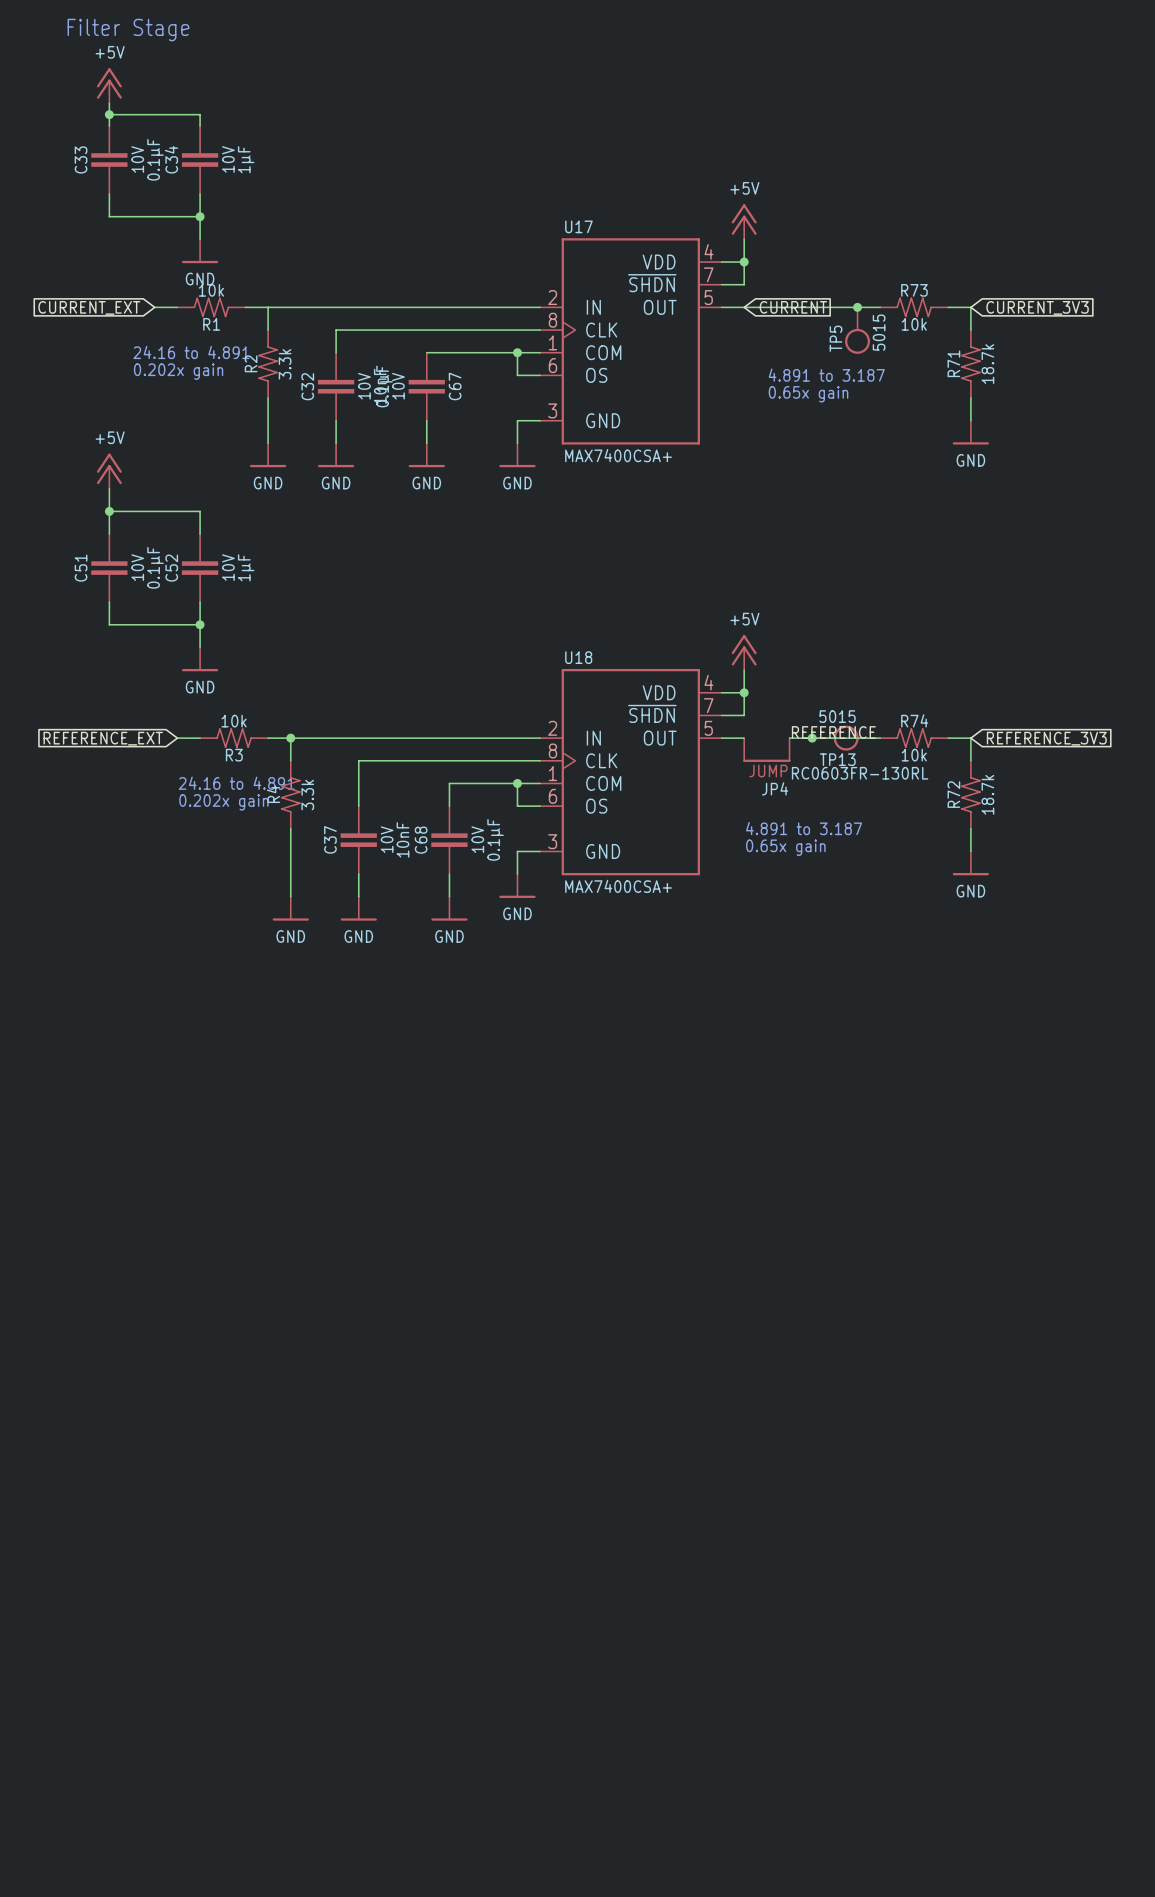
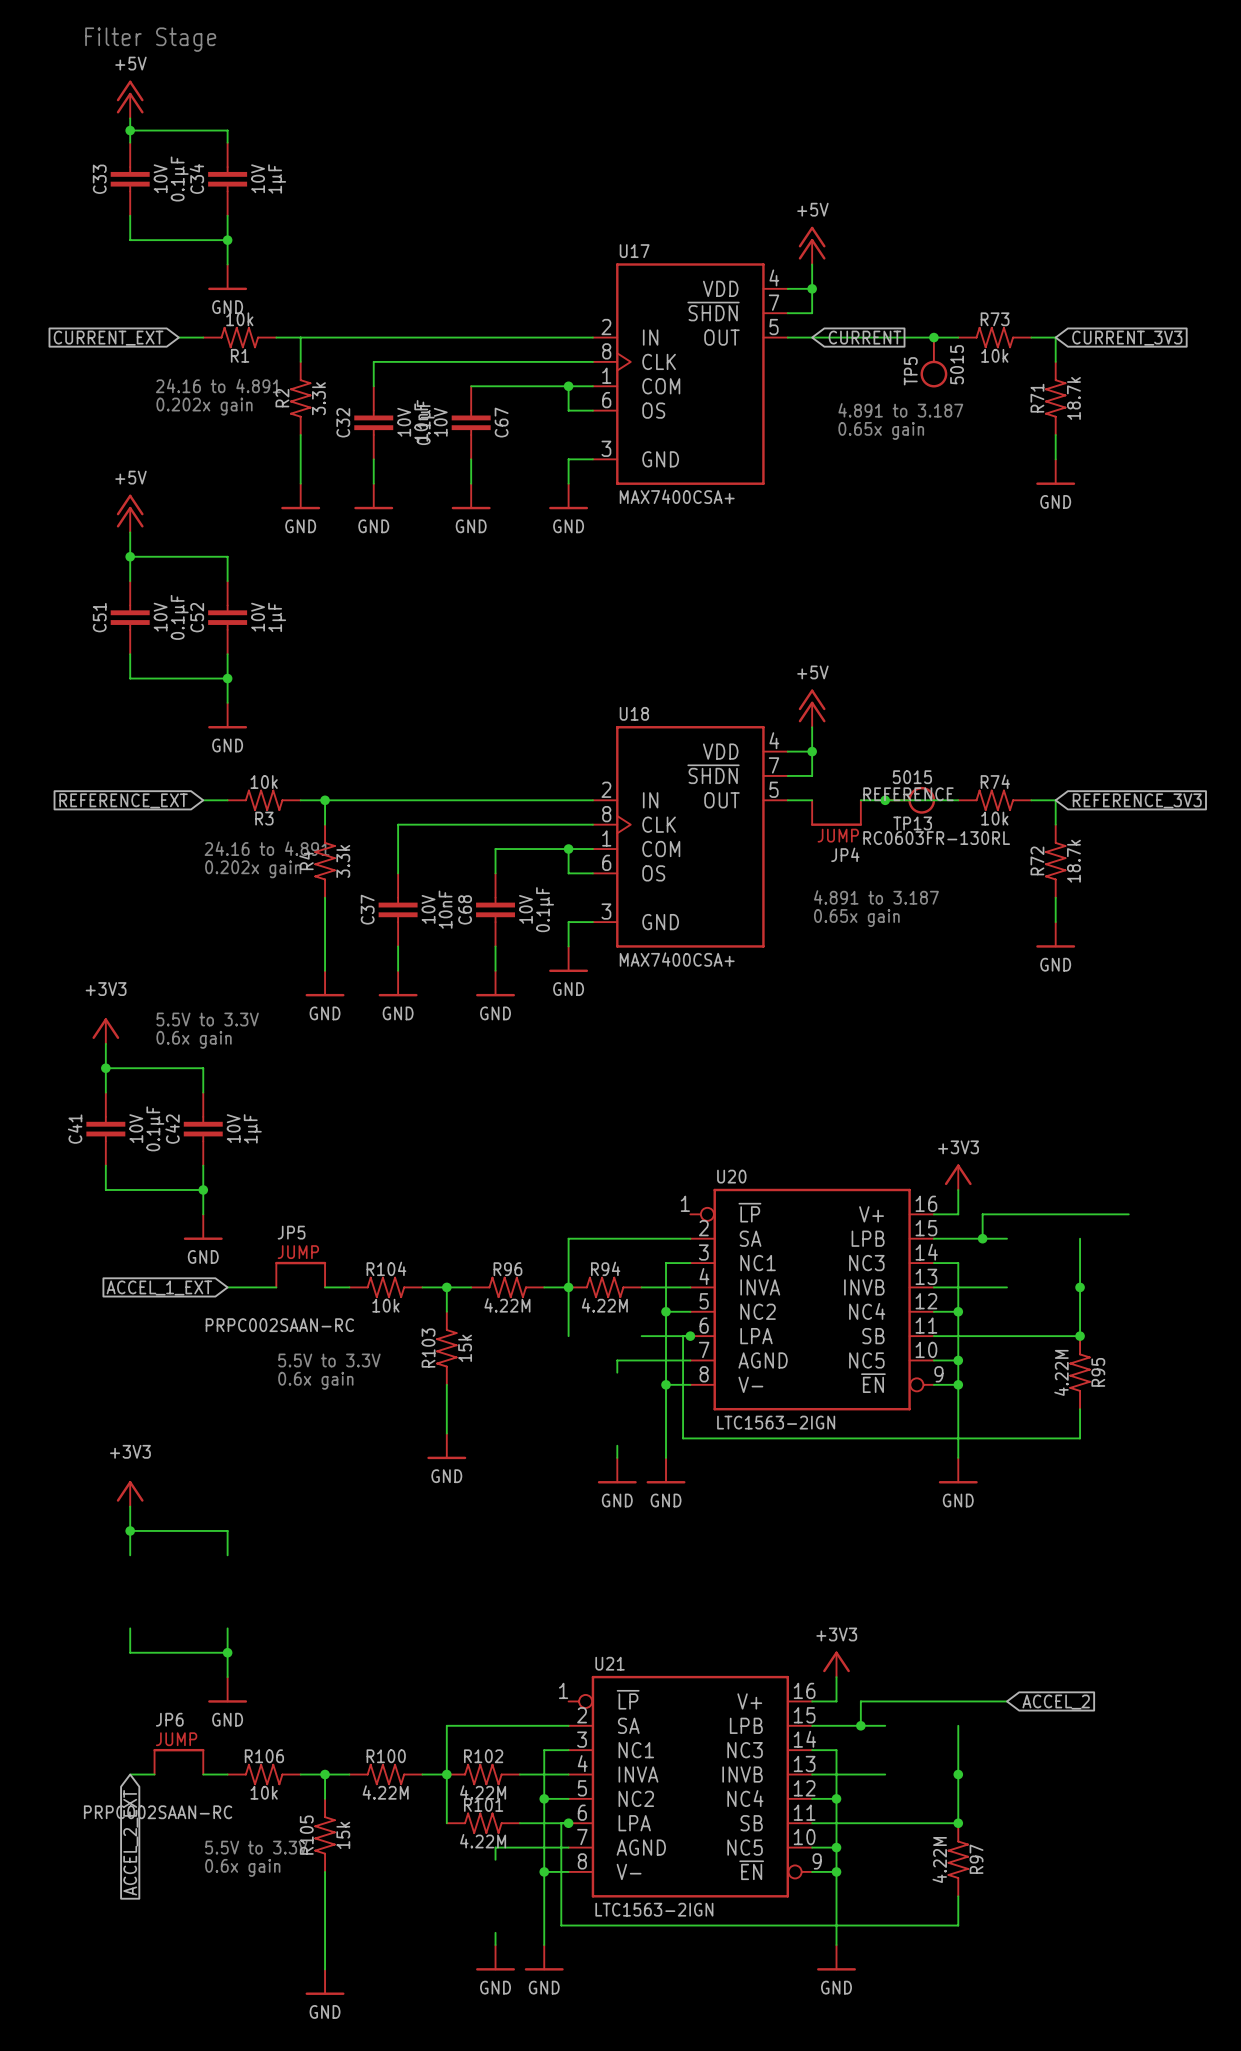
text: none -> 5.5V to 3.3V (207, 1019)
power symbol: none -> +3V3 (105, 1031)
text: none -> 0.6x gain (194, 1039)
wire: none -> (105, 1043) (105, 1092)
wire: none -> (105, 1068) (203, 1068) (203, 1092)
junction: none -> (105, 1068)
C41: none -> (105, 1129)
C42: none -> (203, 1129)
wire: none -> (105, 1165) (105, 1189) (203, 1189)
wire: none -> (203, 1165) (203, 1214)
power symbol: none -> +3V3 (958, 1177)
junction: none -> (203, 1189)
wire: none -> (958, 1189) (958, 1214) (933, 1214)
wire: none -> (1128, 1214) (982, 1214) (982, 1238)
power symbol: none -> GND (203, 1227)
wire: none -> (690, 1238) (568, 1238) (568, 1336)
wire: none -> (933, 1238) (1006, 1238)
junction: none -> (982, 1238)
wire: none -> (1080, 1238) (1080, 1336) (933, 1336)
wire: none -> (690, 1263) (666, 1263) (666, 1457)
wire: none -> (933, 1263) (958, 1263) (958, 1457)
JP5: none -> (300, 1274)
wire: none -> (227, 1287) (276, 1287)
wire: none -> (325, 1287) (349, 1287)
R104: none -> (385, 1287)
wire: none -> (422, 1287) (471, 1287)
wire: none -> (446, 1287) (446, 1311)
junction: none -> (446, 1287)
R96: none -> (507, 1287)
wire: none -> (544, 1287) (568, 1287)
junction: none -> (568, 1287)
R94: none -> (605, 1287)
wire: none -> (641, 1287) (690, 1287)
wire: none -> (933, 1287) (1006, 1287)
junction: none -> (1080, 1287)
global label: none -> ACCEL_1_EXT (159, 1287)
U20: none -> (812, 1299)
wire: none -> (666, 1311) (690, 1311)
junction: none -> (666, 1311)
wire: none -> (933, 1311) (958, 1311)
junction: none -> (958, 1311)
wire: none -> (641, 1336) (690, 1336)
wire: none -> (683, 1336) (683, 1438) (1080, 1438) (1080, 1409)
junction: none -> (690, 1336)
junction: none -> (1080, 1336)
R103: none -> (446, 1348)
text: none -> 5.5V to 3.3V (329, 1360)
wire: none -> (690, 1360) (617, 1360) (617, 1372)
wire: none -> (933, 1360) (958, 1360)
junction: none -> (958, 1360)
R95: none -> (1080, 1372)
text: none -> 0.6x gain (315, 1380)
wire: none -> (446, 1384) (446, 1433)
wire: none -> (666, 1384) (690, 1384)
junction: none -> (666, 1384)
wire: none -> (933, 1384) (958, 1384)
junction: none -> (958, 1384)
wire: none -> (617, 1445) (617, 1457)
power symbol: none -> GND (446, 1446)
power symbol: none -> GND (617, 1470)
power symbol: none -> GND (666, 1470)
power symbol: none -> GND (958, 1470)
power symbol: none -> +3V3 (130, 1493)
wire: none -> (130, 1506) (130, 1555)
wire: none -> (130, 1530) (227, 1530) (227, 1555)
junction: none -> (130, 1530)
wire: none -> (130, 1628) (130, 1652) (227, 1652)
wire: none -> (227, 1628) (227, 1677)
junction: none -> (227, 1652)
power symbol: none -> +3V3 (836, 1664)
wire: none -> (836, 1677) (836, 1701) (812, 1701)
power symbol: none -> GND (227, 1689)
wire: none -> (1006, 1701) (860, 1701) (860, 1725)
global label: none -> ACCEL_2 (1056, 1702)
wire: none -> (568, 1725) (446, 1725) (446, 1823)
wire: none -> (812, 1725) (885, 1725)
junction: none -> (860, 1725)
wire: none -> (958, 1725) (958, 1823) (812, 1823)
wire: none -> (568, 1750) (544, 1750) (544, 1945)
wire: none -> (812, 1750) (836, 1750) (836, 1945)
JP6: none -> (178, 1761)
wire: none -> (130, 1774) (154, 1774)
wire: none -> (203, 1774) (227, 1774)
R106: none -> (264, 1774)
wire: none -> (300, 1774) (349, 1774)
wire: none -> (325, 1774) (325, 1798)
junction: none -> (325, 1774)
R100: none -> (385, 1774)
wire: none -> (422, 1774) (446, 1774)
junction: none -> (446, 1774)
R102: none -> (483, 1774)
wire: none -> (519, 1774) (568, 1774)
wire: none -> (812, 1774) (885, 1774)
junction: none -> (958, 1774)
U21: none -> (690, 1786)
wire: none -> (544, 1798) (568, 1798)
junction: none -> (544, 1798)
wire: none -> (812, 1798) (836, 1798)
junction: none -> (836, 1798)
R101: none -> (483, 1823)
wire: none -> (519, 1823) (568, 1823)
wire: none -> (561, 1823) (561, 1925) (958, 1925) (958, 1896)
junction: none -> (568, 1823)
junction: none -> (958, 1823)
R105: none -> (325, 1835)
global label: none -> ACCEL_2_EXT (130, 1842)
text: none -> 5.5V to 3.3V (256, 1847)
wire: none -> (568, 1847) (495, 1847) (495, 1859)
wire: none -> (812, 1847) (836, 1847)
junction: none -> (836, 1847)
R97: none -> (958, 1859)
text: none -> 0.6x gain (242, 1867)
wire: none -> (325, 1871) (325, 1969)
wire: none -> (544, 1871) (568, 1871)
junction: none -> (544, 1871)
wire: none -> (812, 1871) (836, 1871)
junction: none -> (836, 1871)
wire: none -> (495, 1932) (495, 1945)
power symbol: none -> GND (495, 1957)
power symbol: none -> GND (544, 1957)
power symbol: none -> GND (836, 1957)
power symbol: none -> GND (325, 1982)

